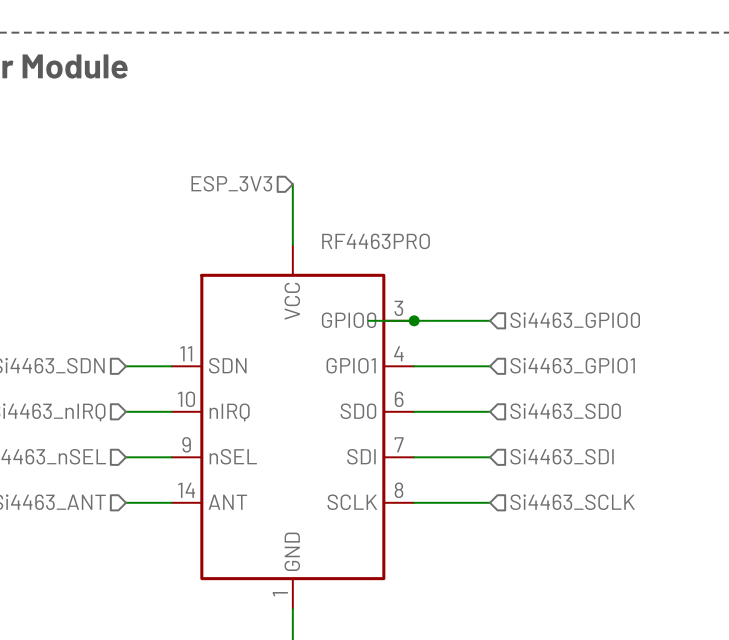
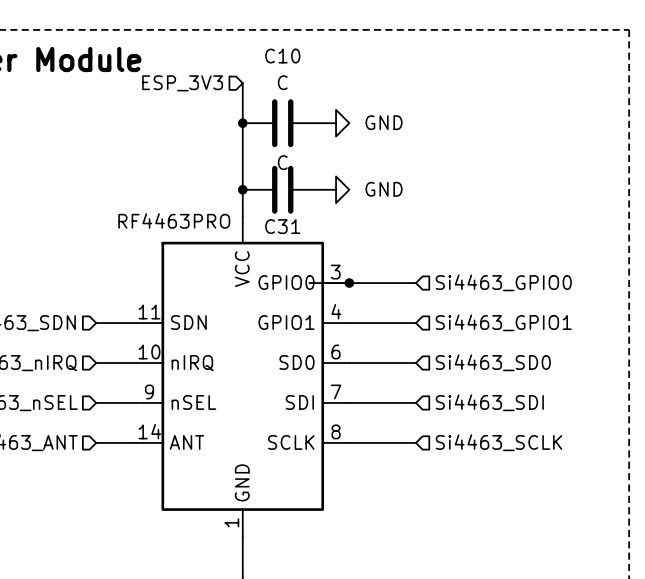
wire: none -> (242, 83) (242, 163)
junction: none -> (242, 123)
C10: none -> C (282, 123)
power symbol: none -> GND (336, 123)
hierarchical label position: ESP_3V3 (231, 183) -> ESP_3V3 (182, 83)
junction: none -> (242, 189)
C31: none -> C (282, 189)
power symbol: none -> GND (336, 189)
part value position: RF4463PRO (376, 241) -> RF4463PRO (174, 220)

